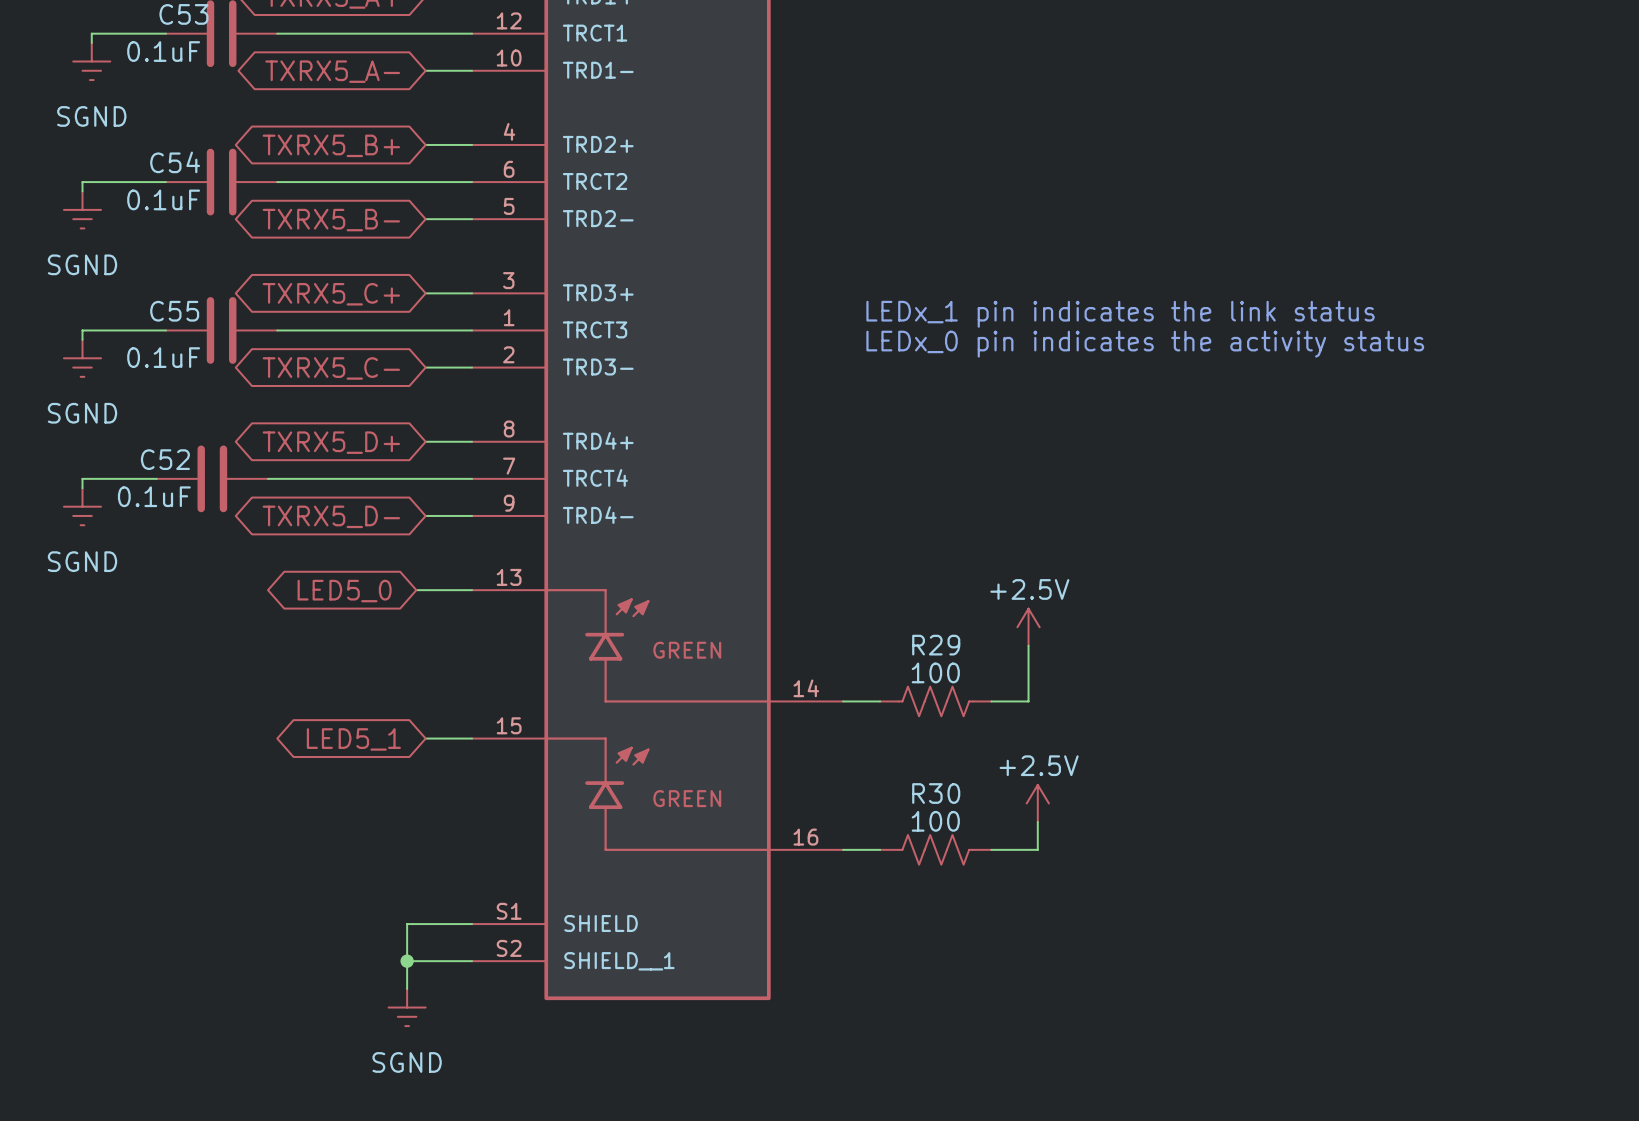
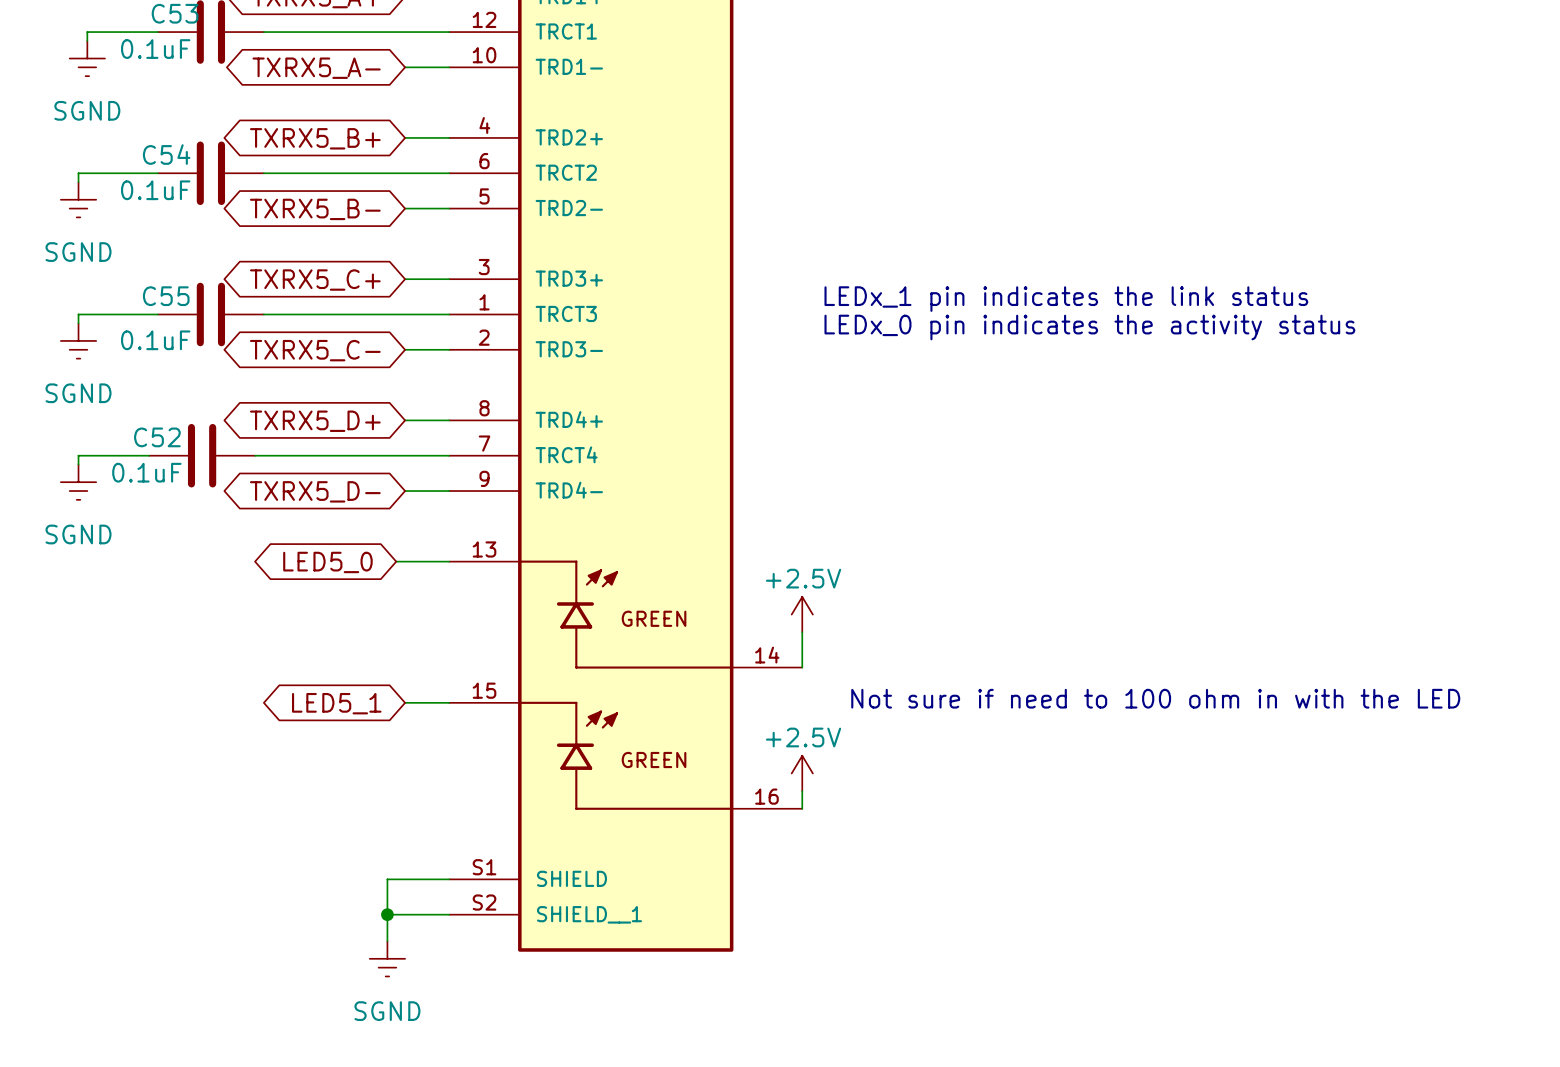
power symbol: +2.5V (1028, 627) -> none
power symbol: none -> +2.5V (802, 614)
wire: (1028, 645) (1028, 701) (991, 701) -> none
wire: (843, 701) (880, 701) -> (802, 667) (802, 632)
R29: 100 (935, 701) -> none
text: none -> Not sure if need to 100 ohm in with the LED (1155, 698)
power symbol: +2.5V (1037, 803) -> none
power symbol: none -> +2.5V (802, 773)
wire: (1037, 822) (1037, 849) (991, 849) -> none
wire: (843, 849) (880, 849) -> (802, 808) (802, 791)
R30: 100 (935, 849) -> none

